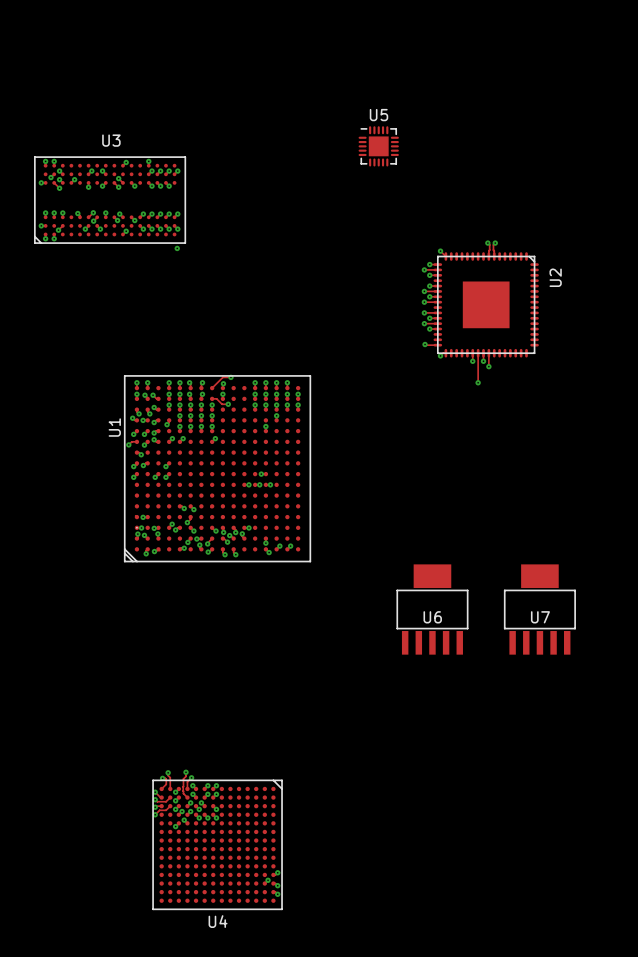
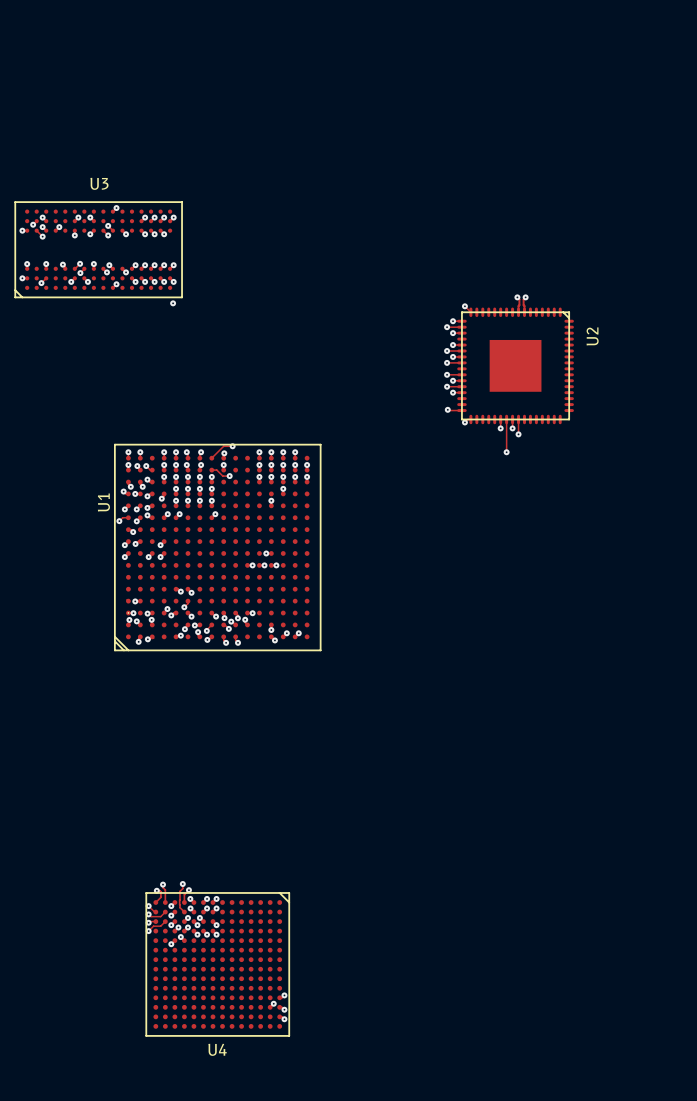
U5: (378, 146) -> none
via: (45, 161) -> none
via: (54, 161) -> none
via: (148, 161) -> none
via: (54, 212) -> none
via: (45, 238) -> none
via: (54, 238) -> none
U6: (432, 609) -> none
U7: (539, 609) -> none

